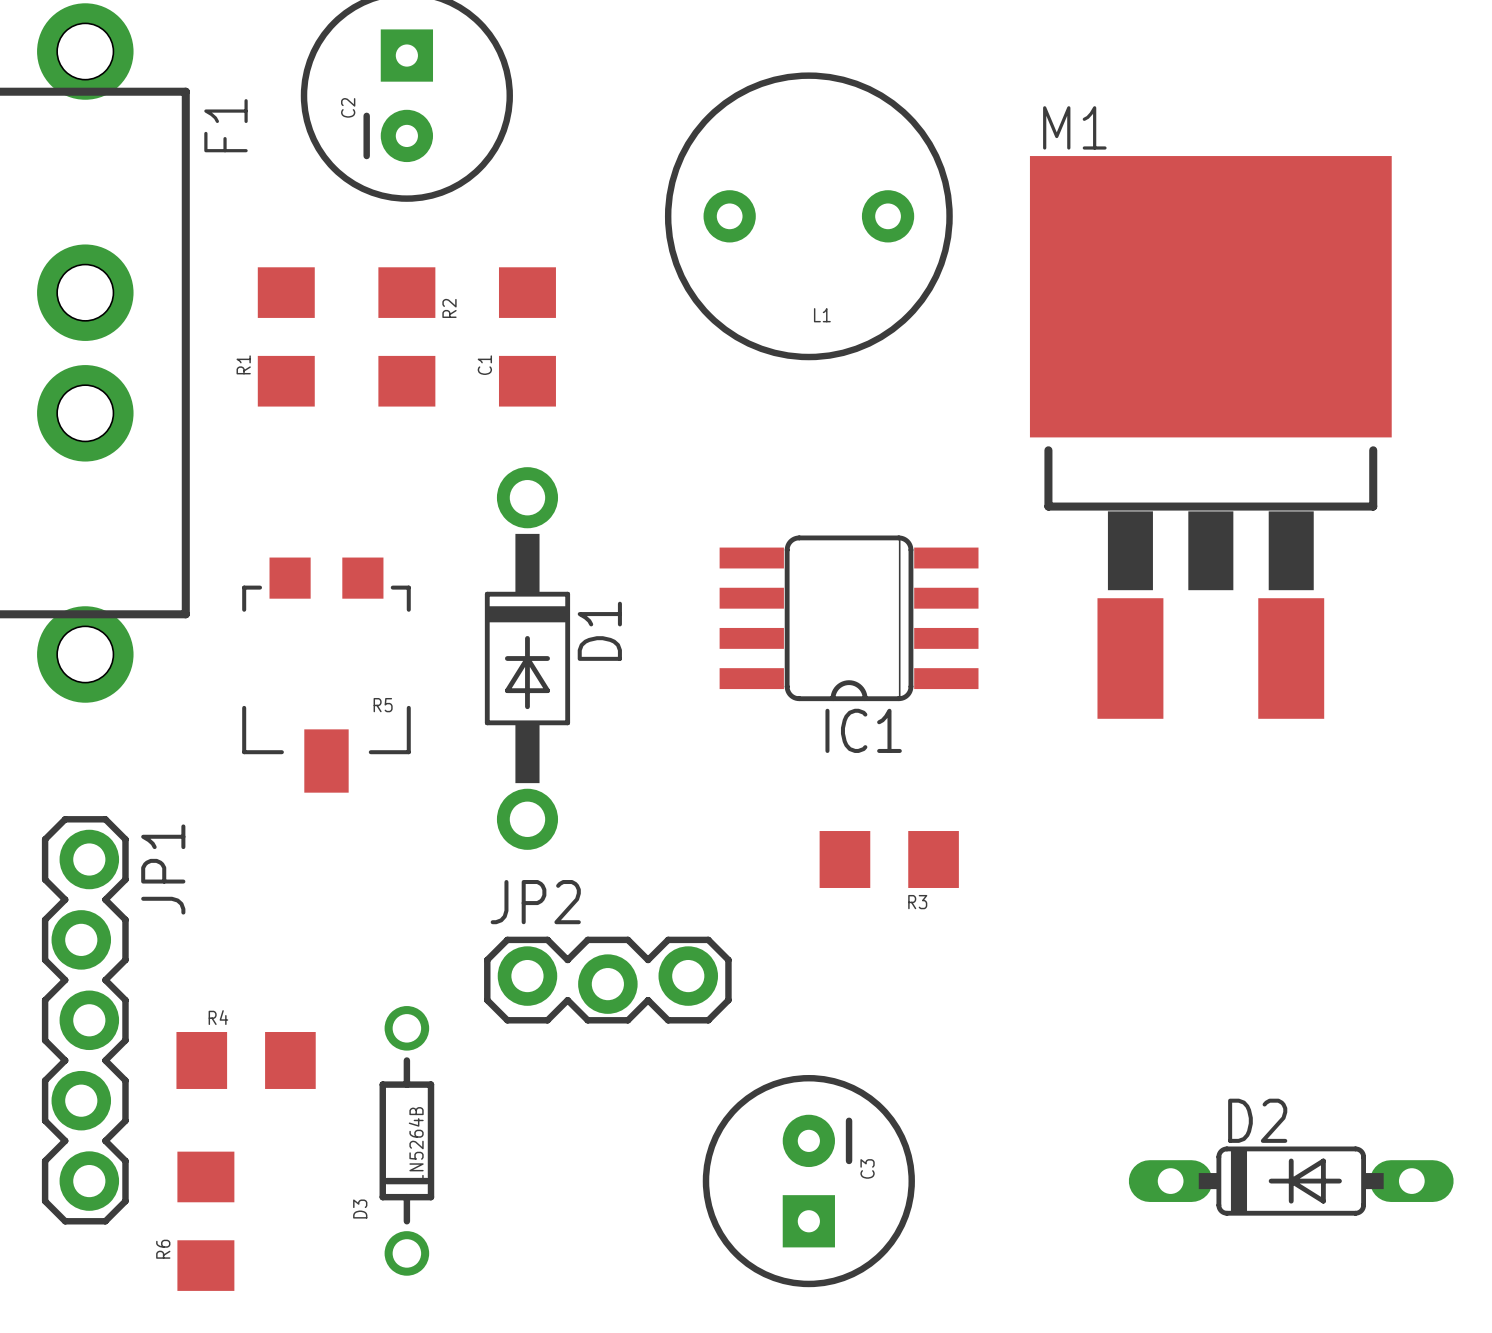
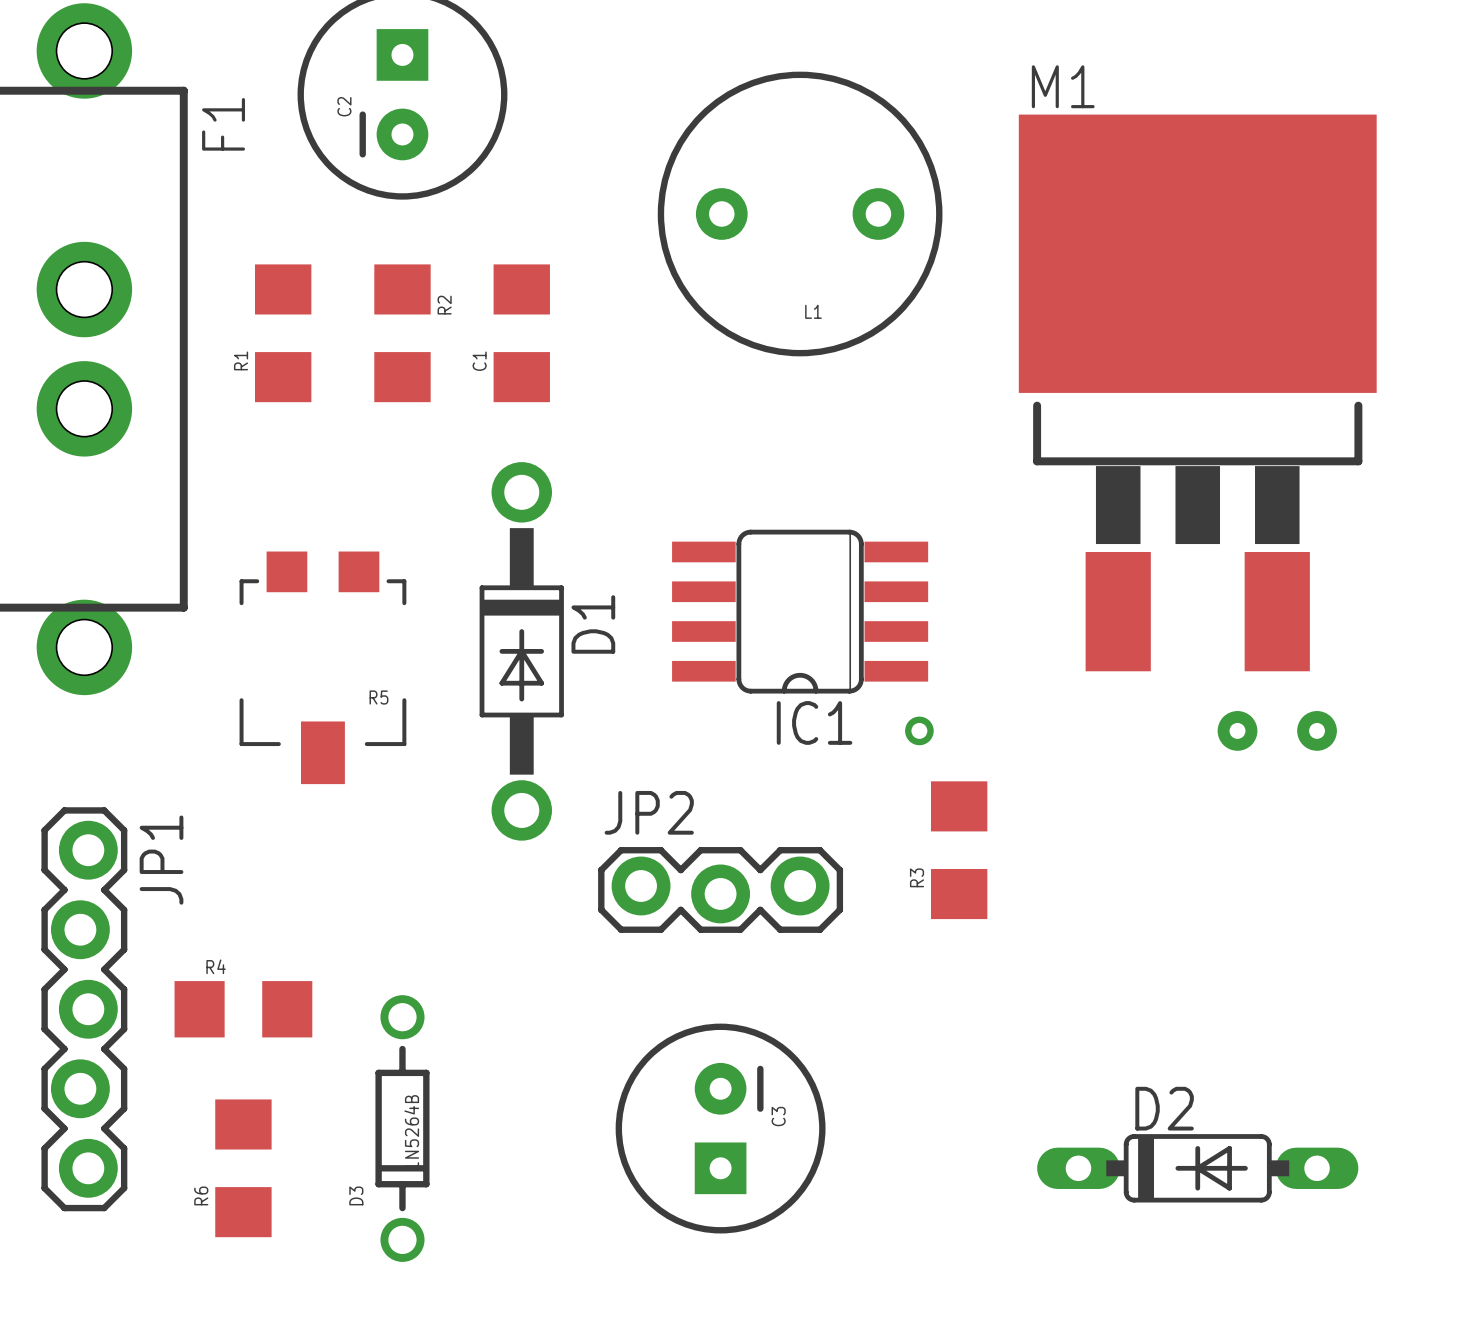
M1 position: (1210, 437) -> (1197, 392)
IC1 position: (849, 618) -> (800, 611)
via: none -> (919, 730)
via: none -> (1237, 730)
via: none -> (1317, 730)
R3 rotation: 0° (889, 859) -> 90° clockwise (959, 850)
JP2 position: (607, 980) -> (720, 889)
R4 position: (246, 1060) -> (243, 1009)
C3 position: (808, 1181) -> (720, 1128)
D2 position: (1291, 1181) -> (1197, 1168)
R6 position: (205, 1221) -> (243, 1168)

